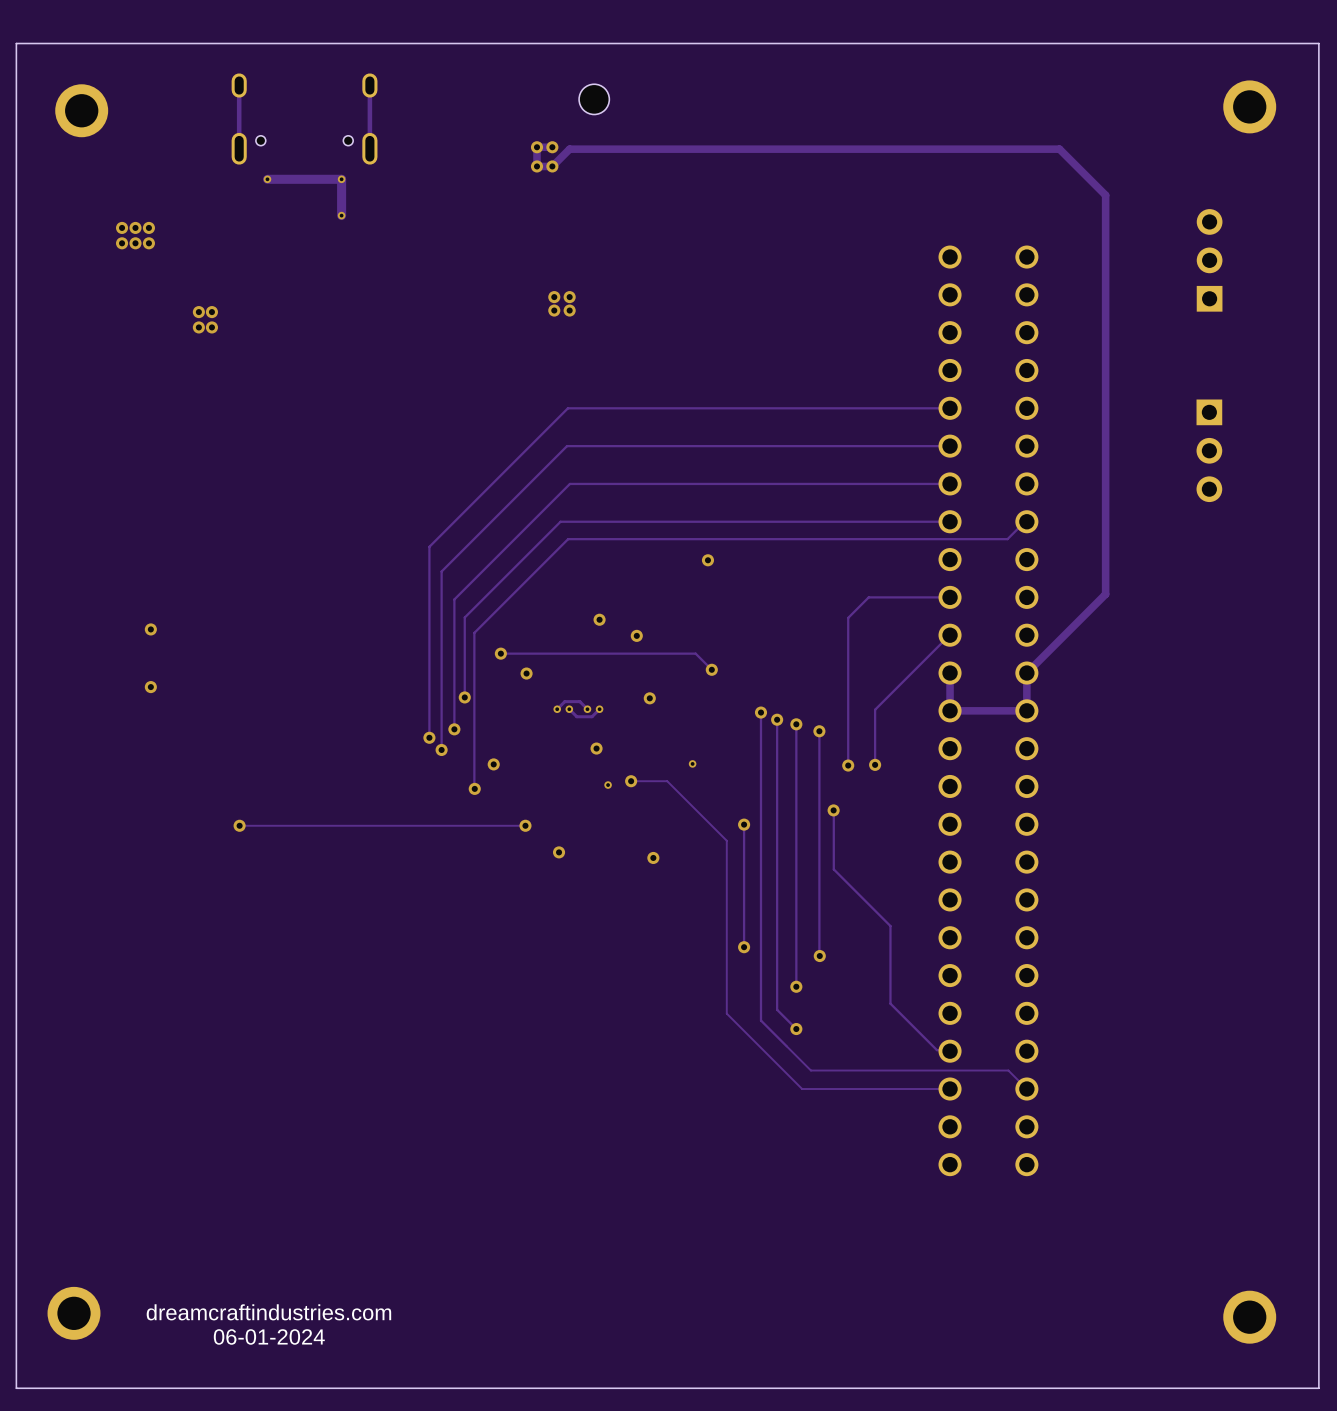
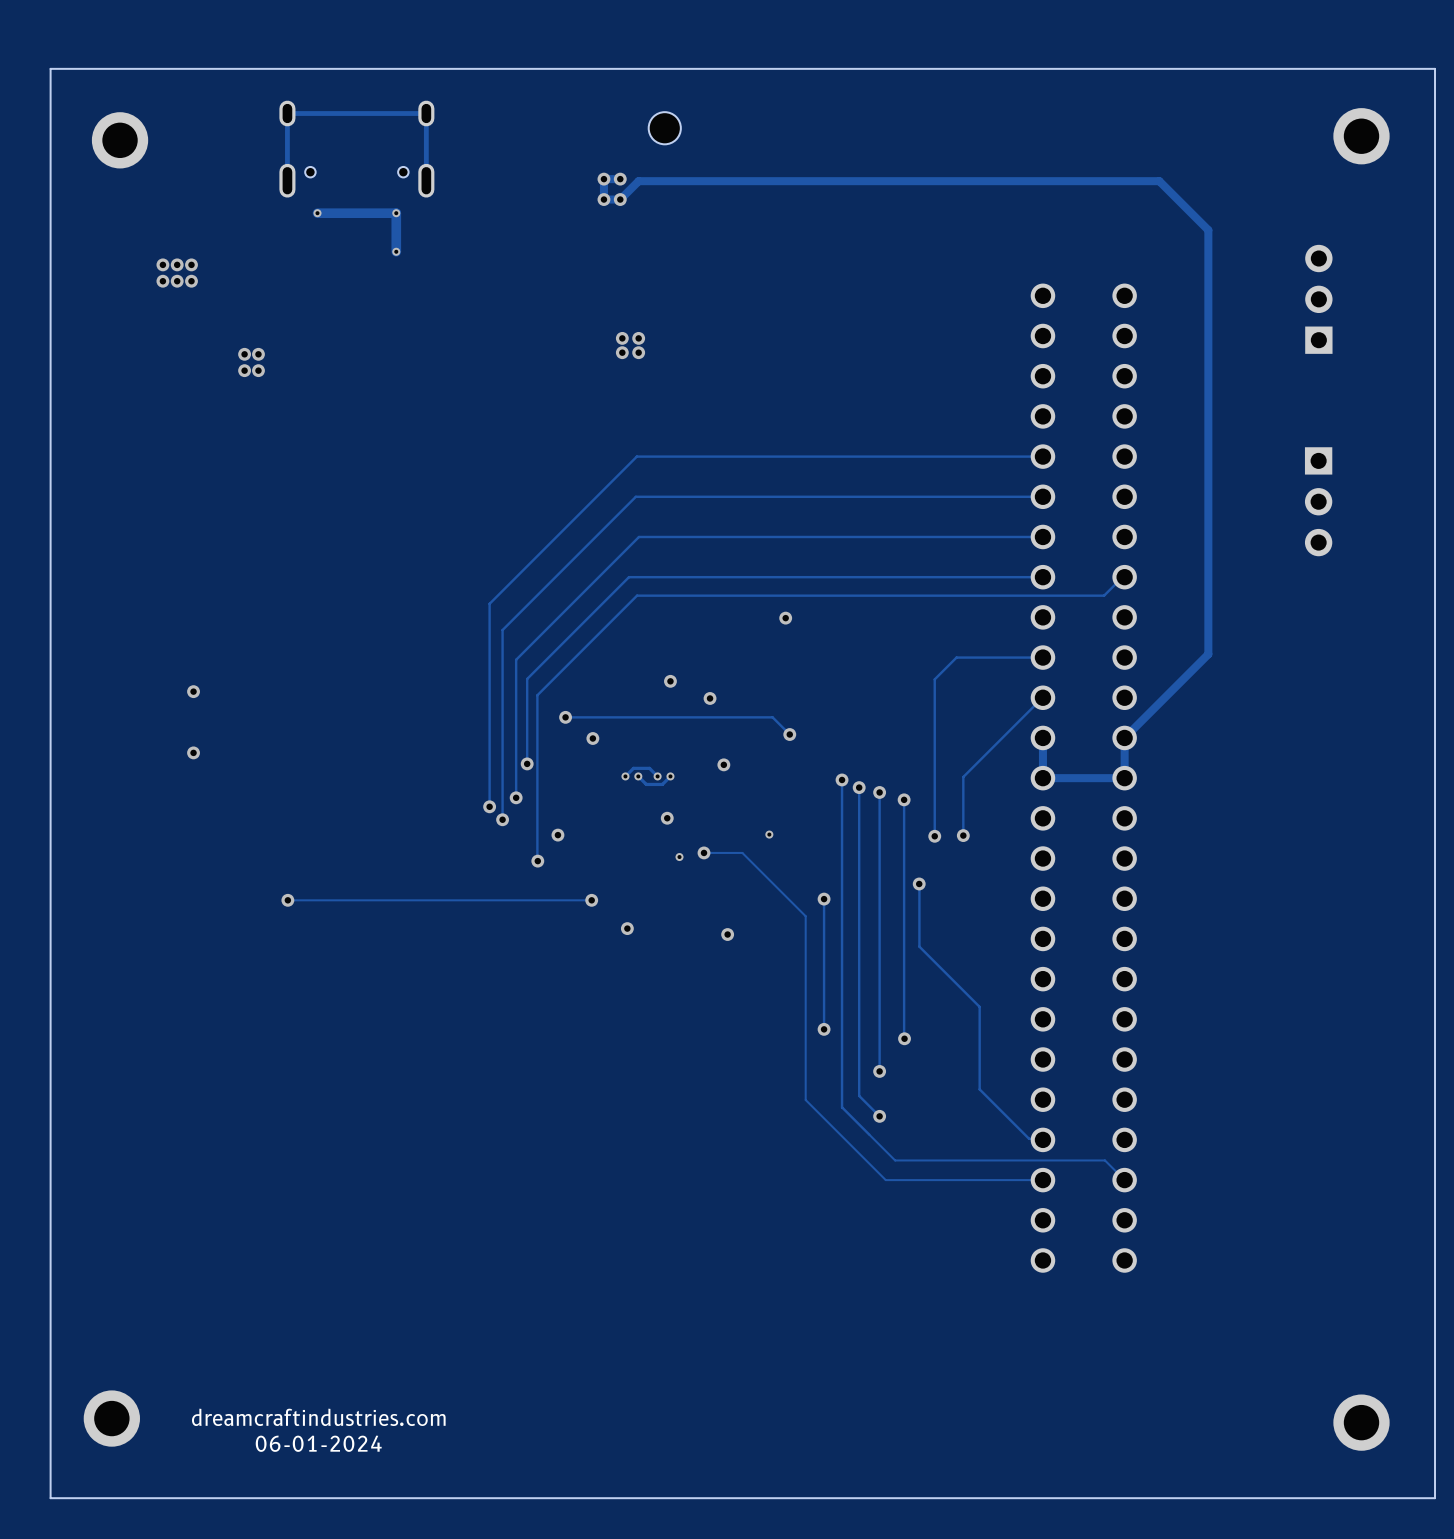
track: none -> (426, 113) (287, 113)

